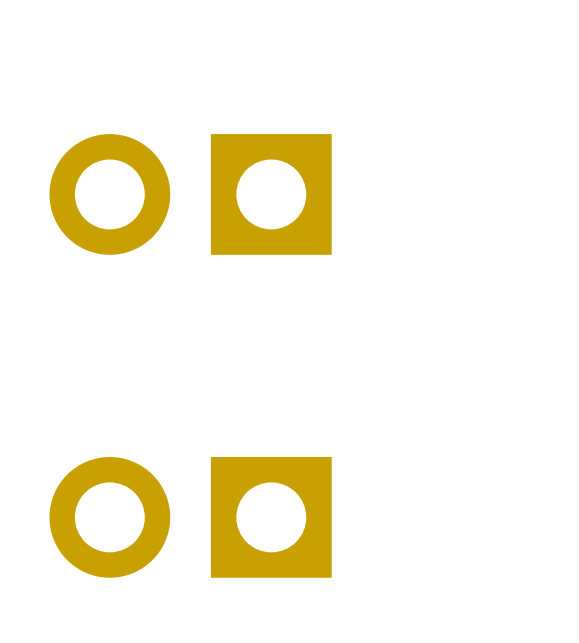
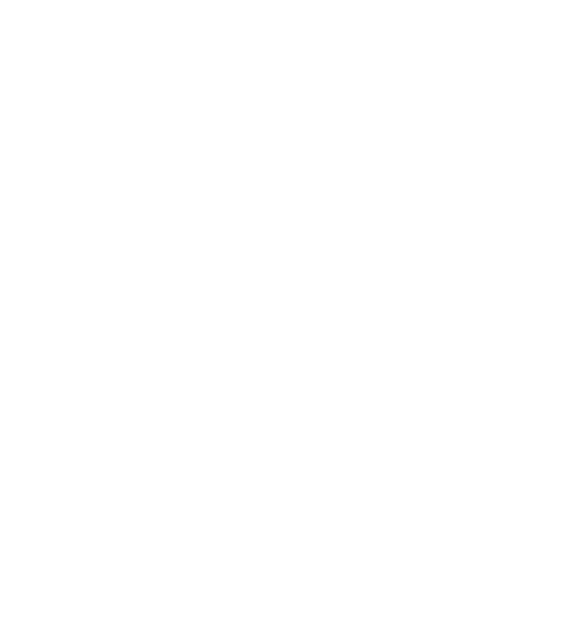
part: (190, 194) -> none
part: (190, 517) -> none

